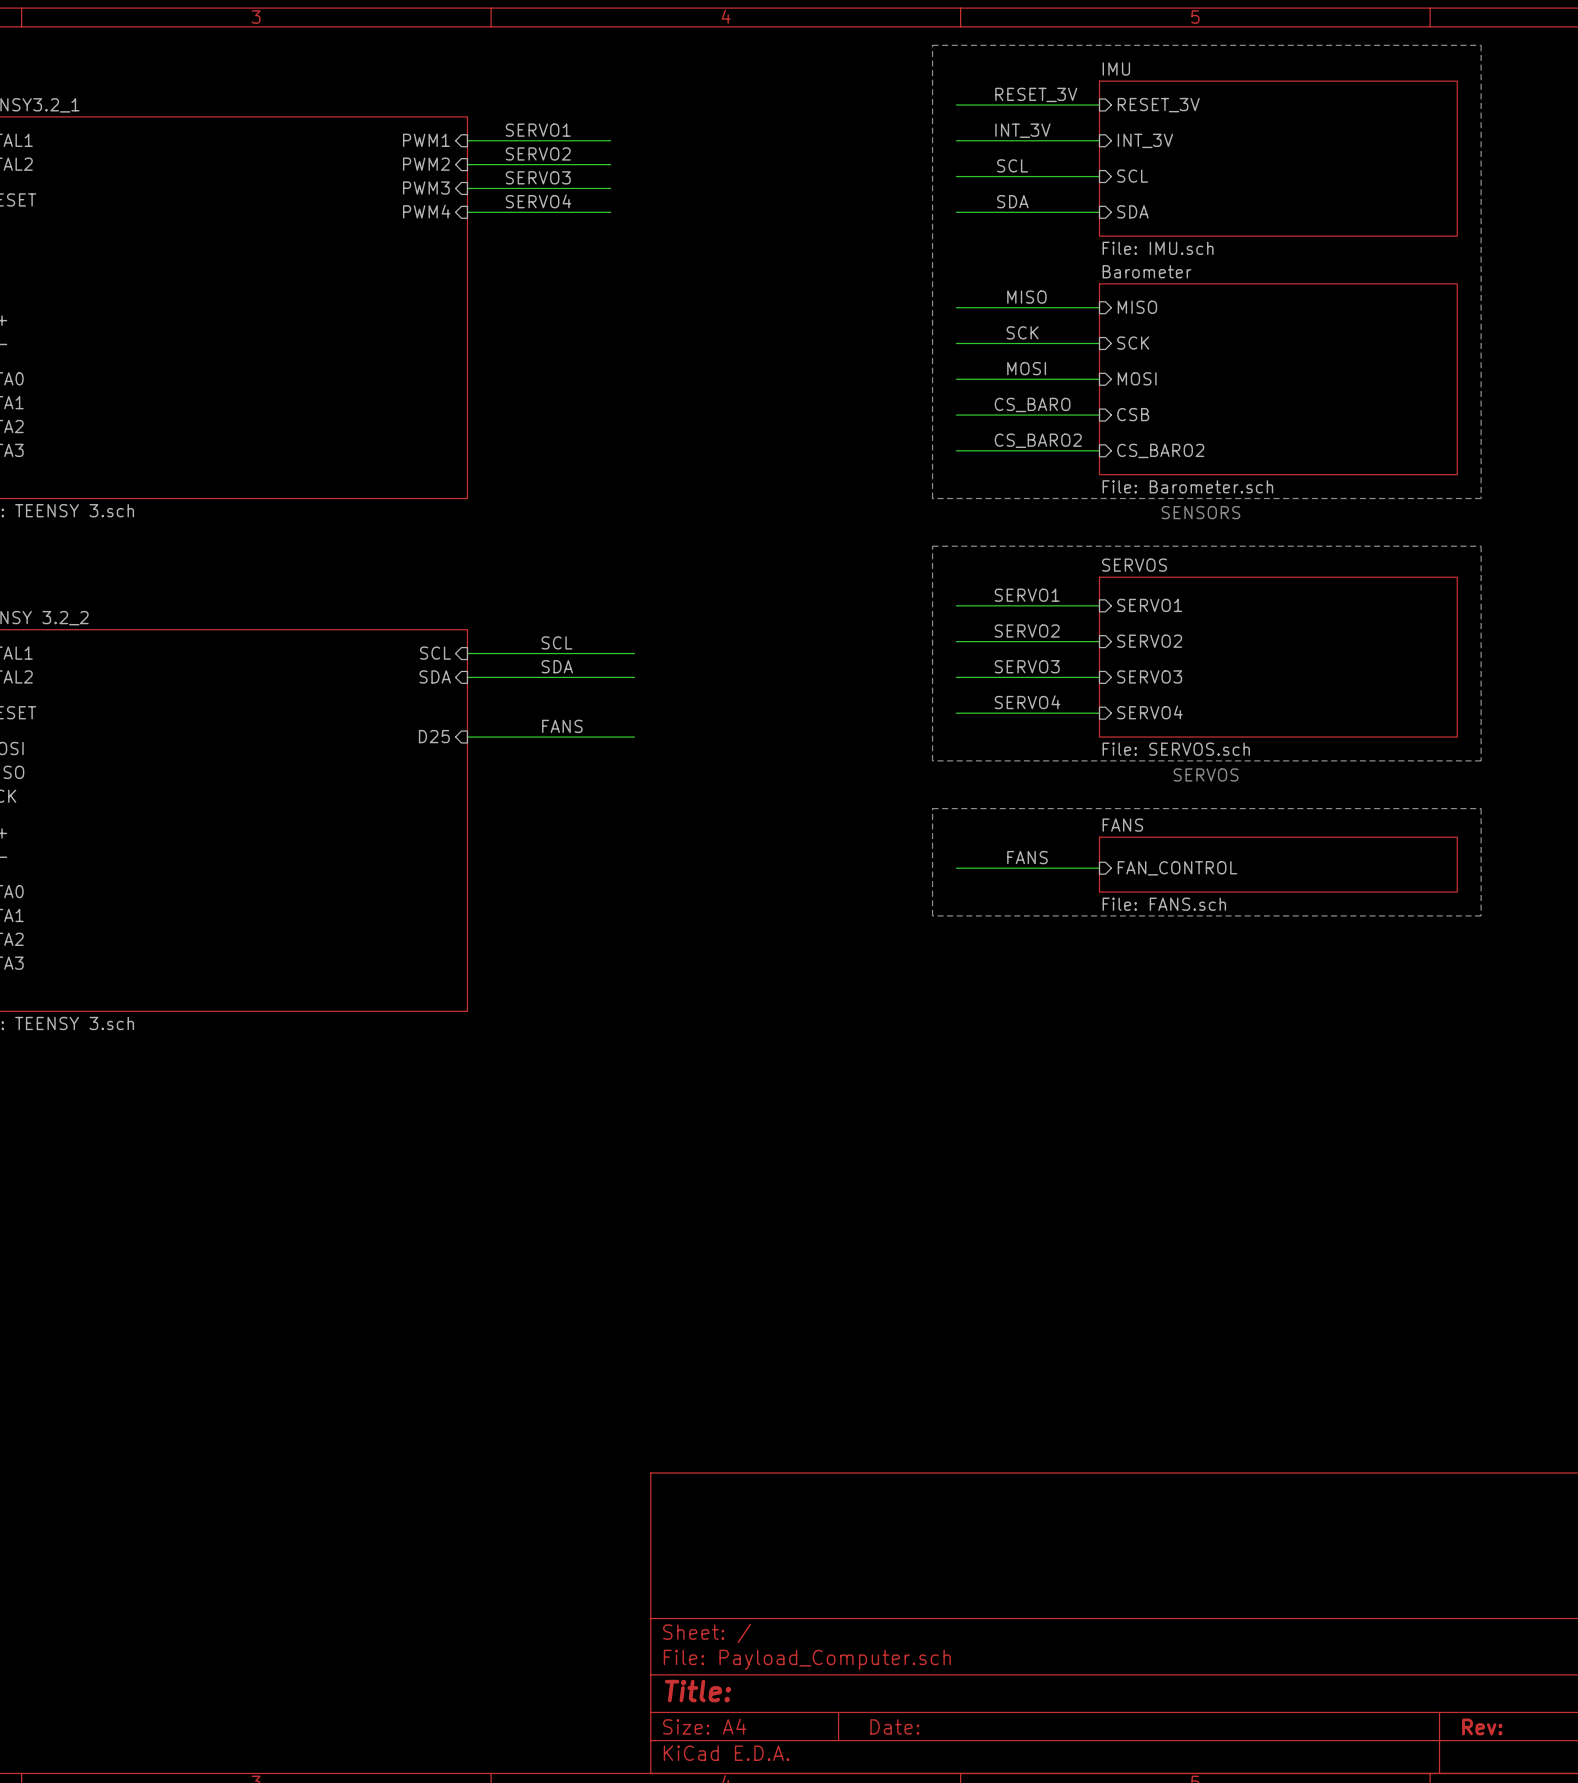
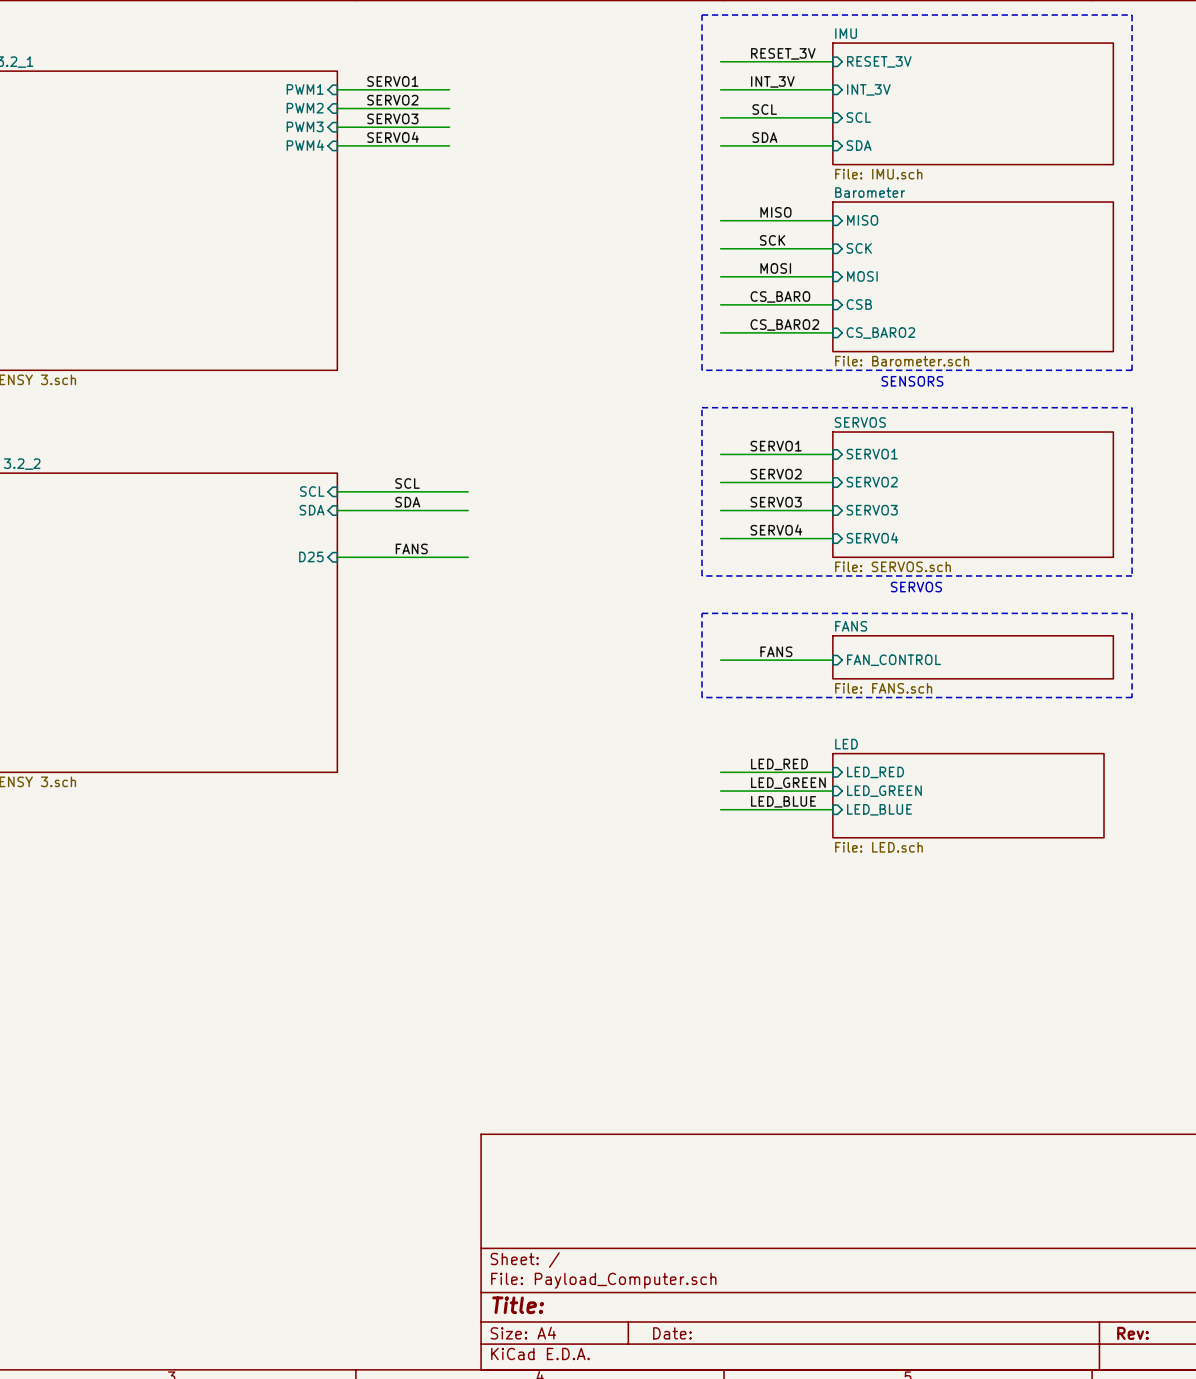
label: none -> LED_RED (779, 764)
wire: none -> (720, 772) (832, 772)
sheet pin: none -> LED_RED (875, 772)
label: none -> LED_GREEN (788, 783)
wire: none -> (720, 791) (832, 791)
sheet pin: none -> LED_GREEN (884, 791)
sheet LED: none -> File: LED.sch (968, 795)
label: none -> LED_BLUE (783, 801)
wire: none -> (720, 809) (832, 809)
sheet pin: none -> LED_BLUE (879, 809)

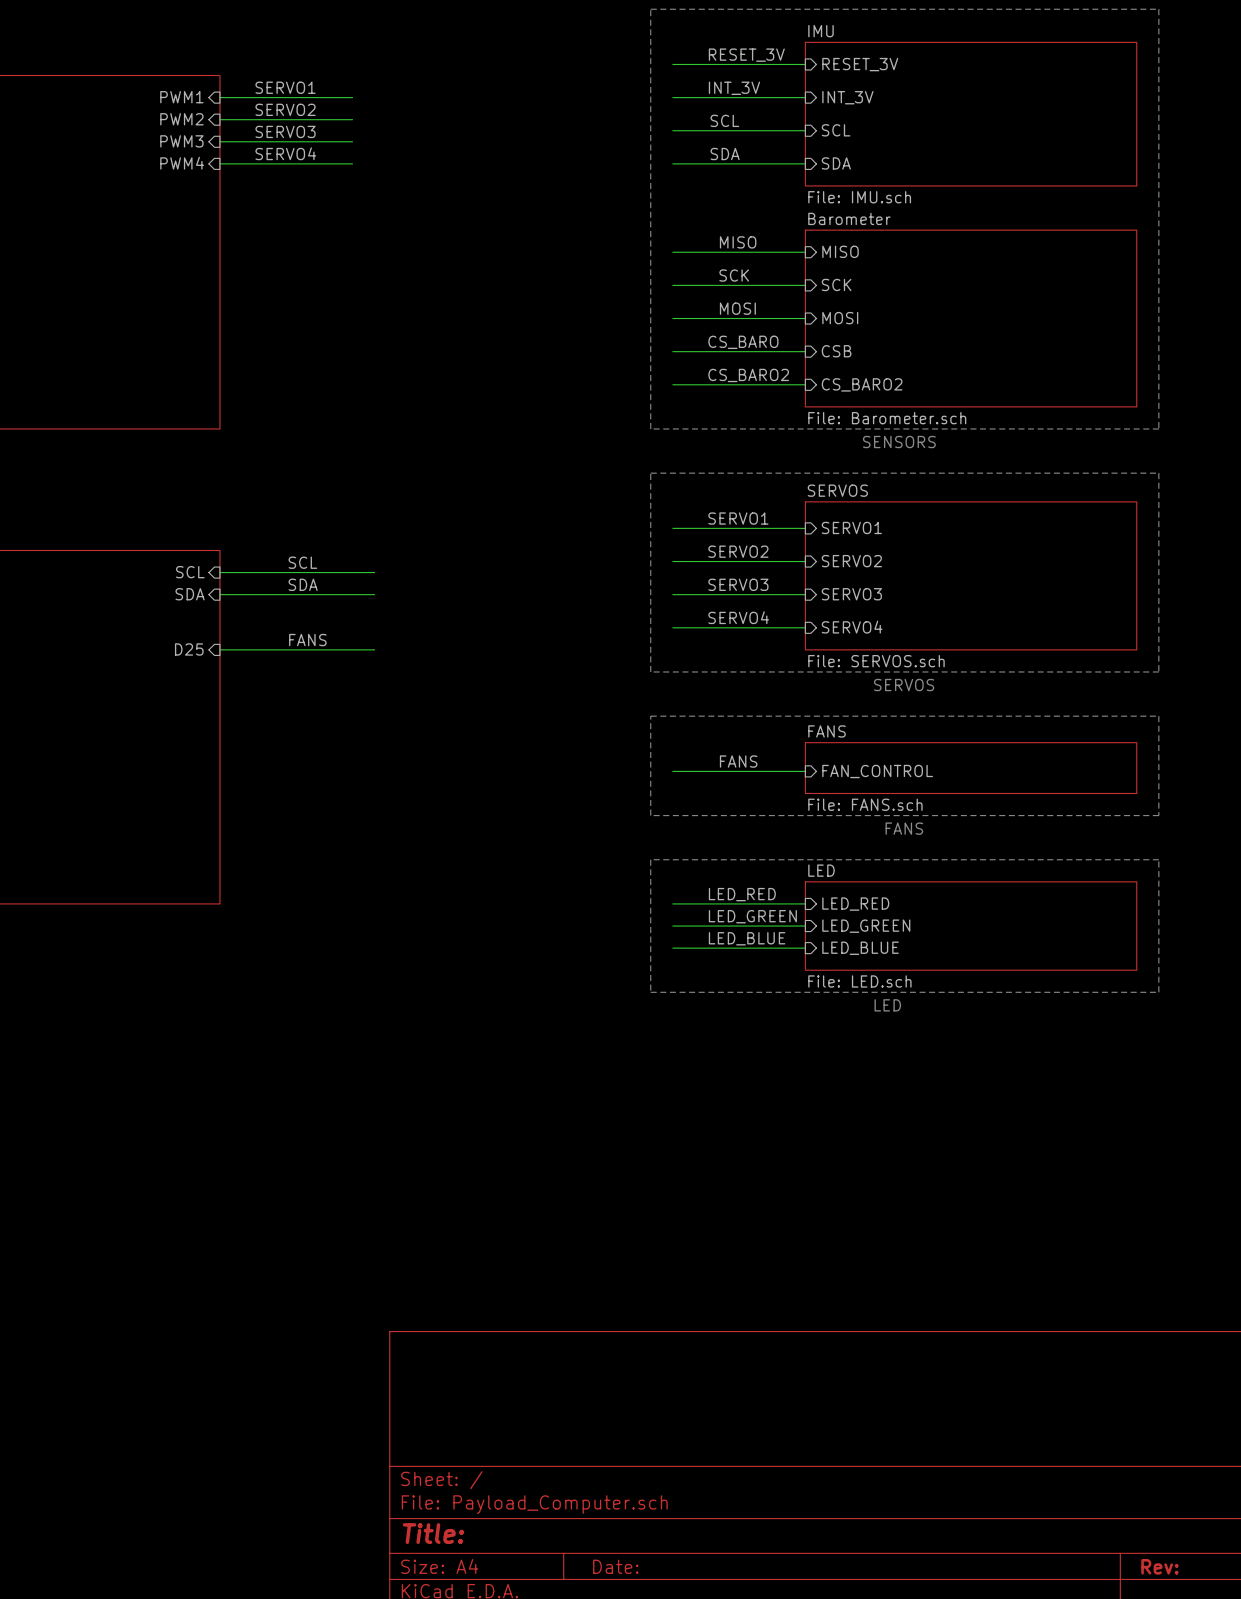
text: none -> FANS (904, 828)
line: none -> (650, 859) (1158, 859) (1158, 992) (650, 992) (650, 859)
sheet LED shape: [832, 753, 1105, 838] -> [805, 881, 1137, 971]
text: none -> LED (887, 1005)

